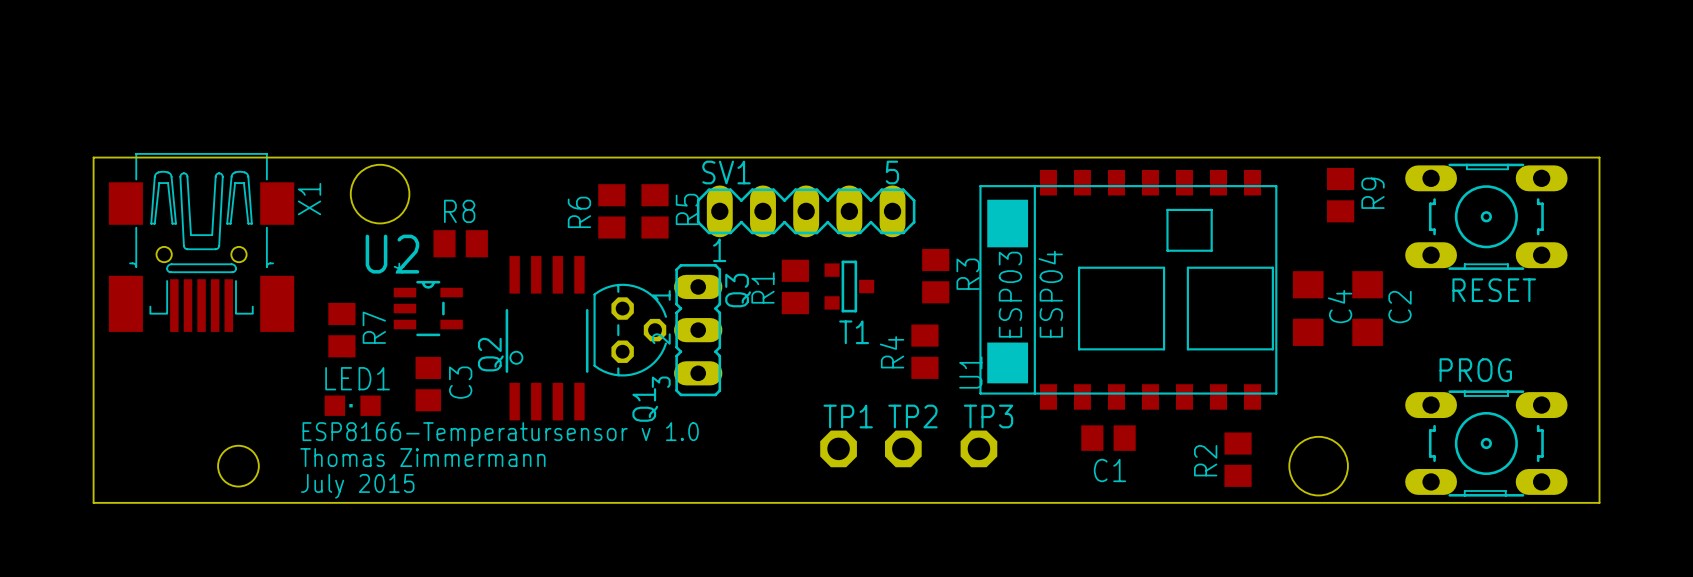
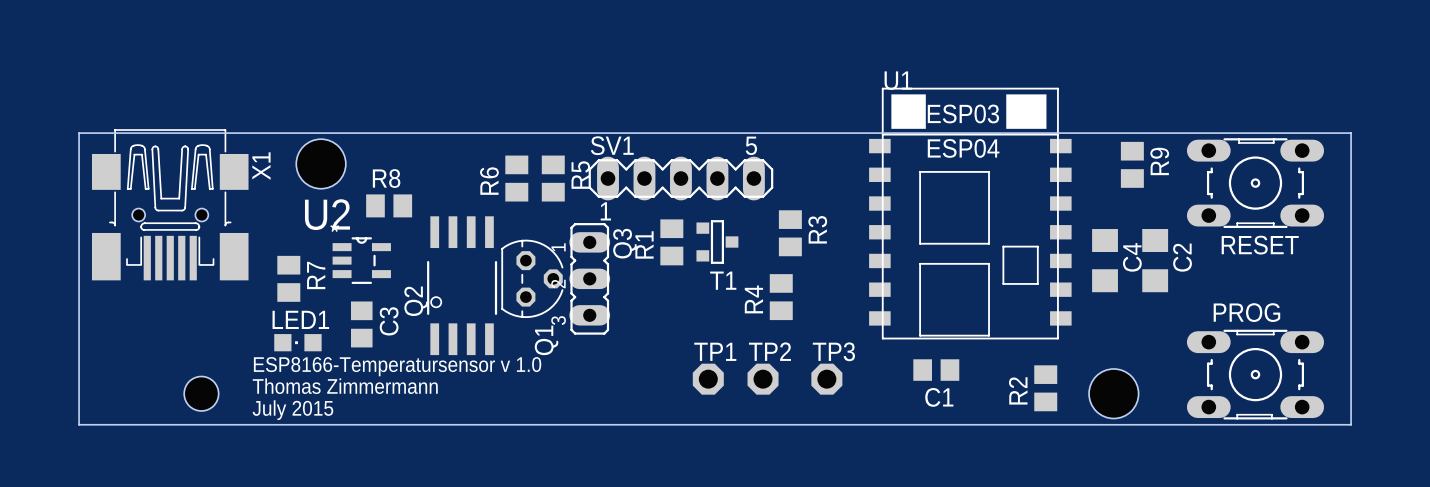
U1 rotation: 0° (1128, 289) -> 90° clockwise (970, 213)

